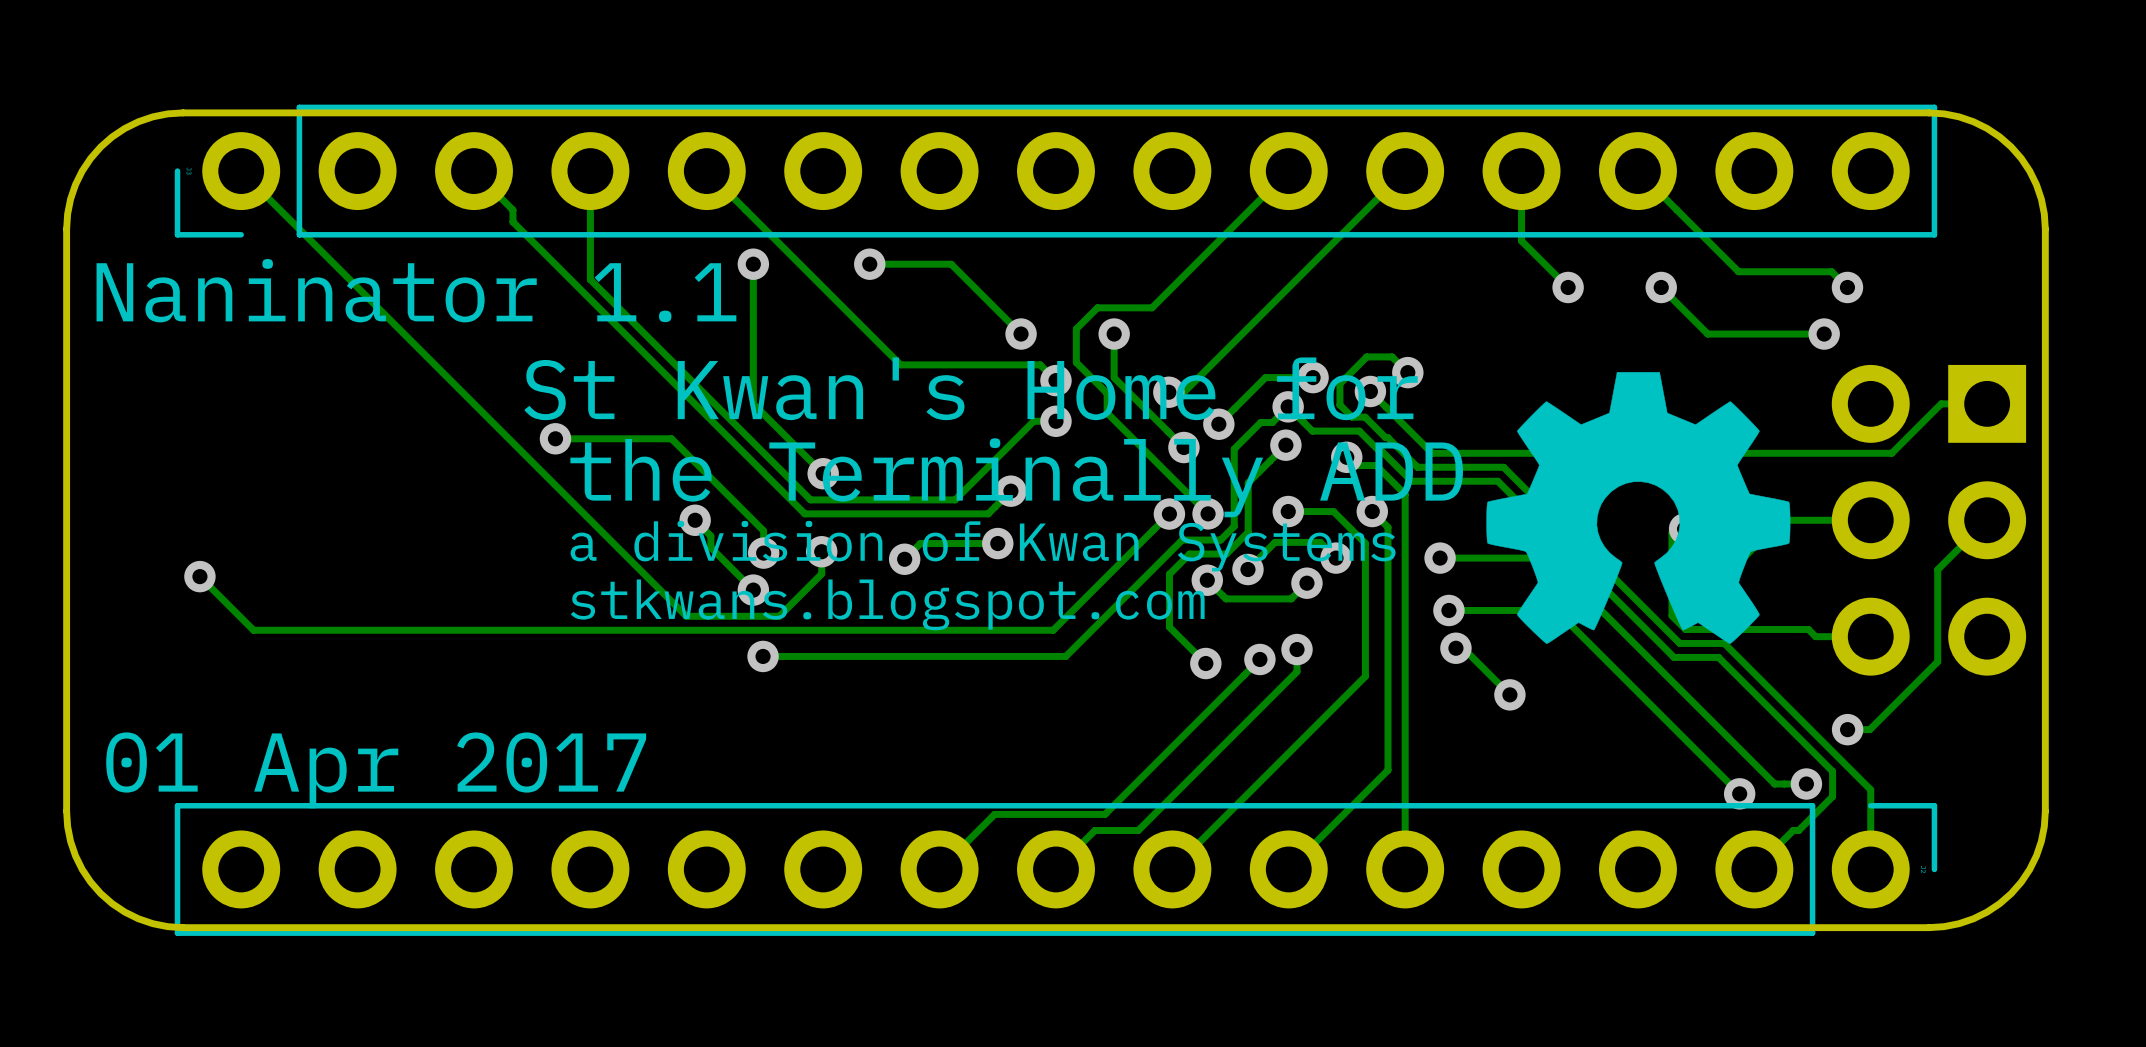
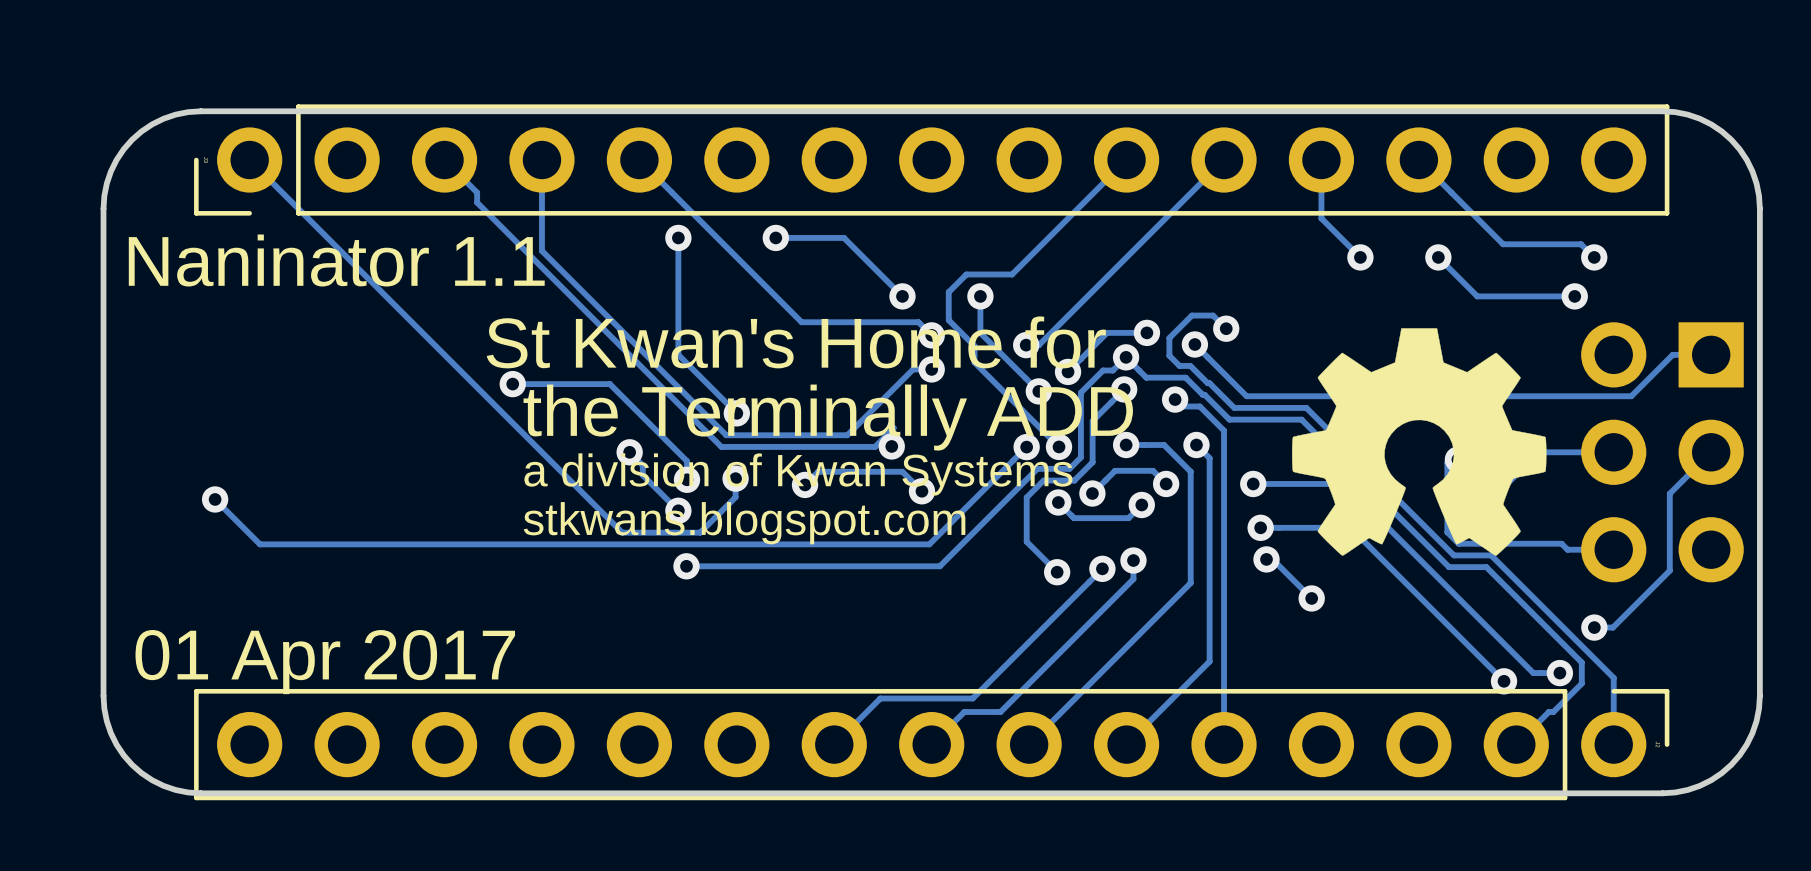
via: (1010, 491) -> none
via: none -> (891, 446)
track: none -> (882, 471) (902, 471) (921, 491)
via: (997, 543) -> none
via: none -> (921, 491)

